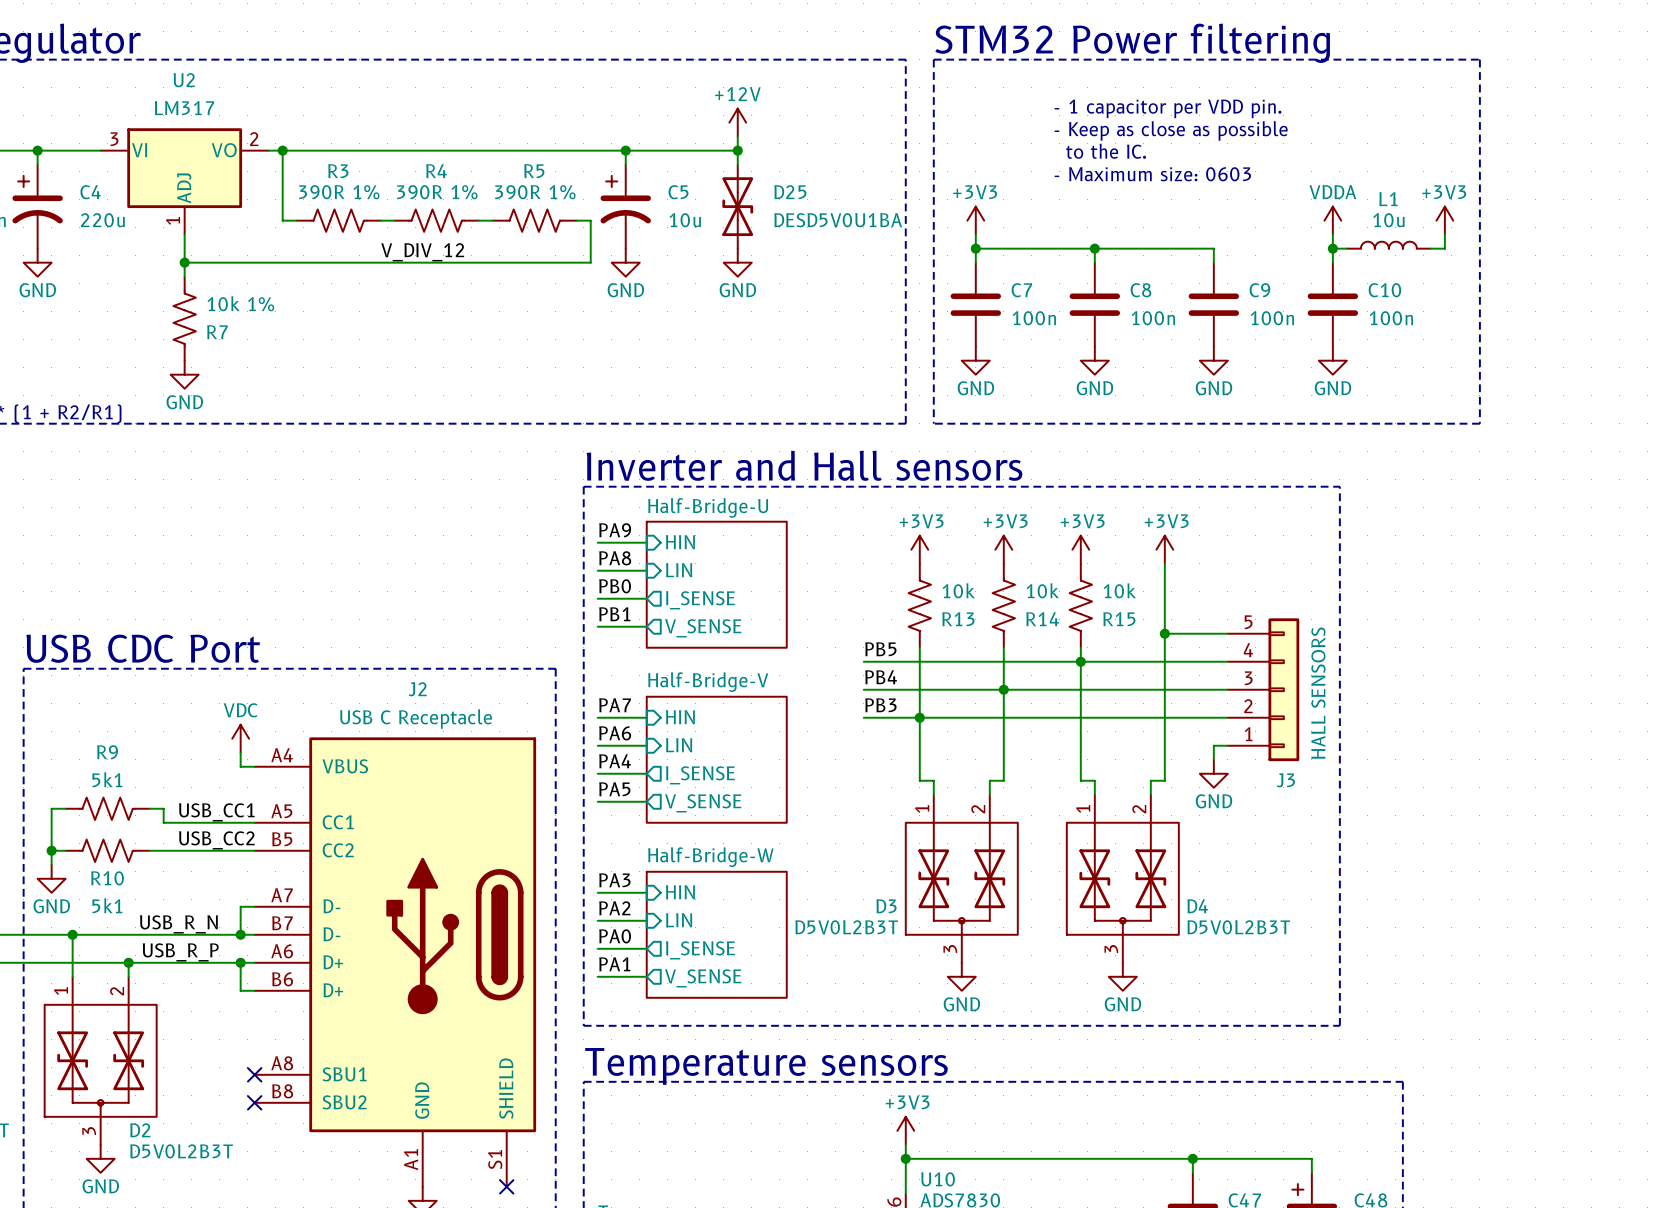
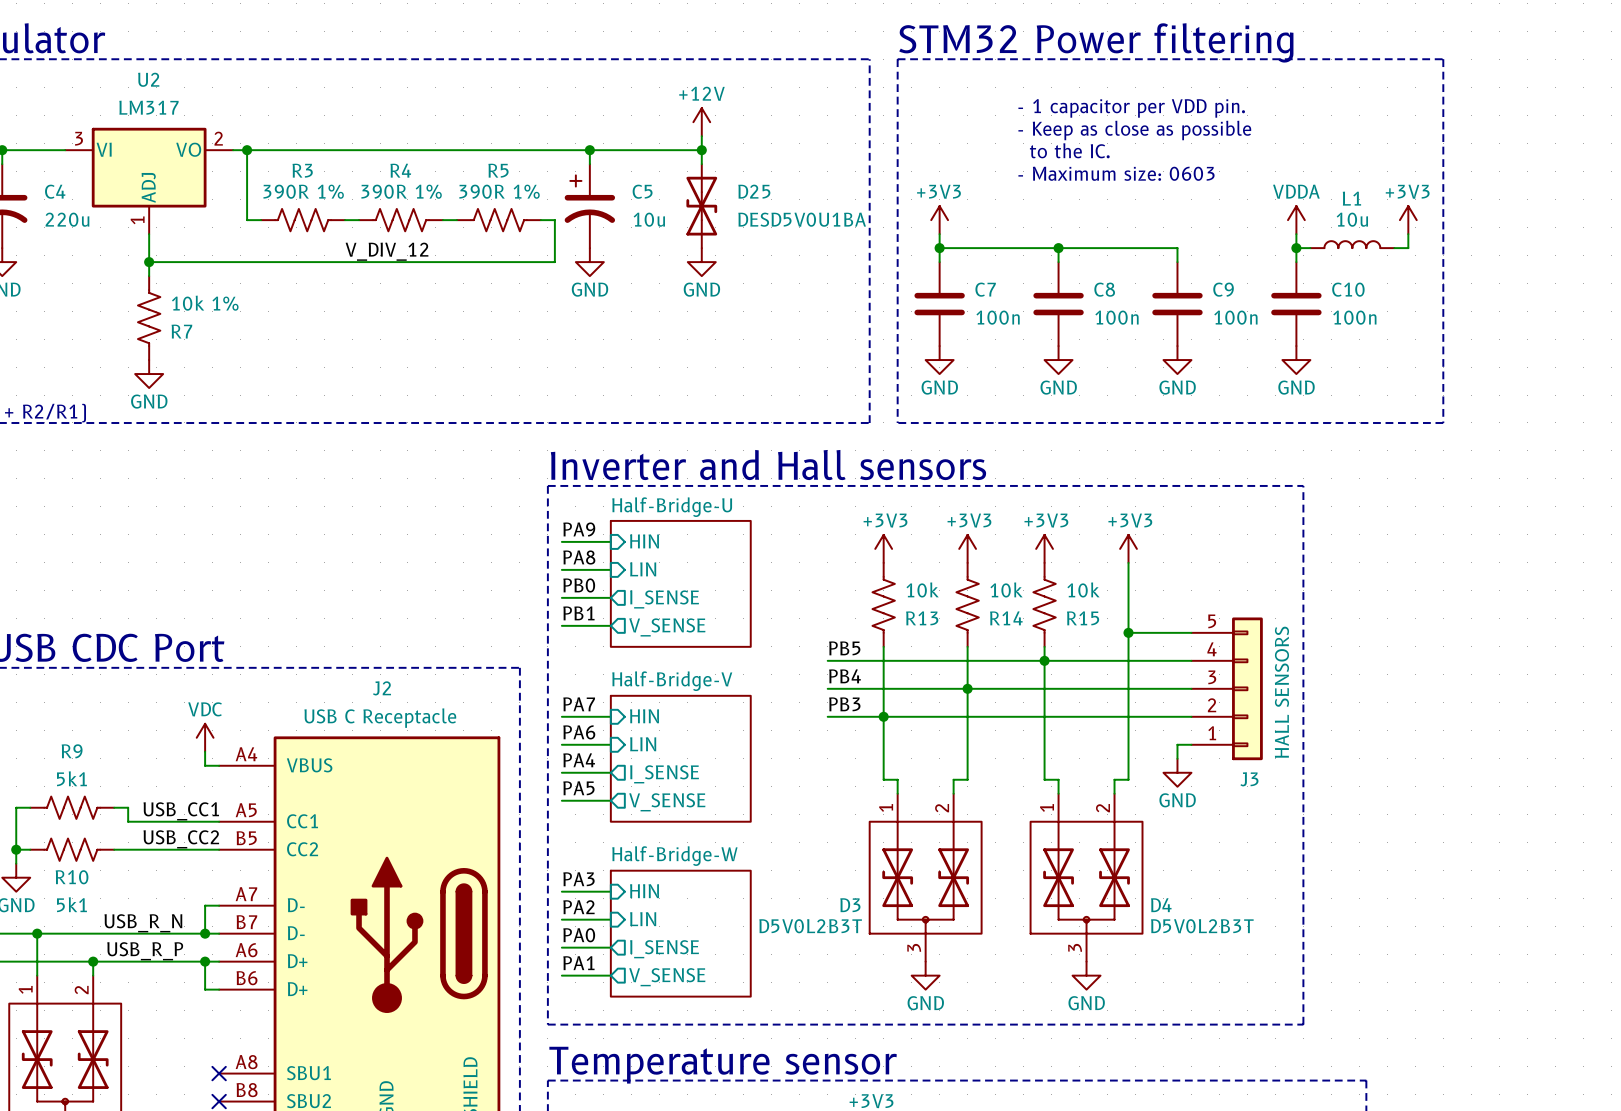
text: Temperature sensors (766, 1066) -> Temperature sensor (723, 1065)

